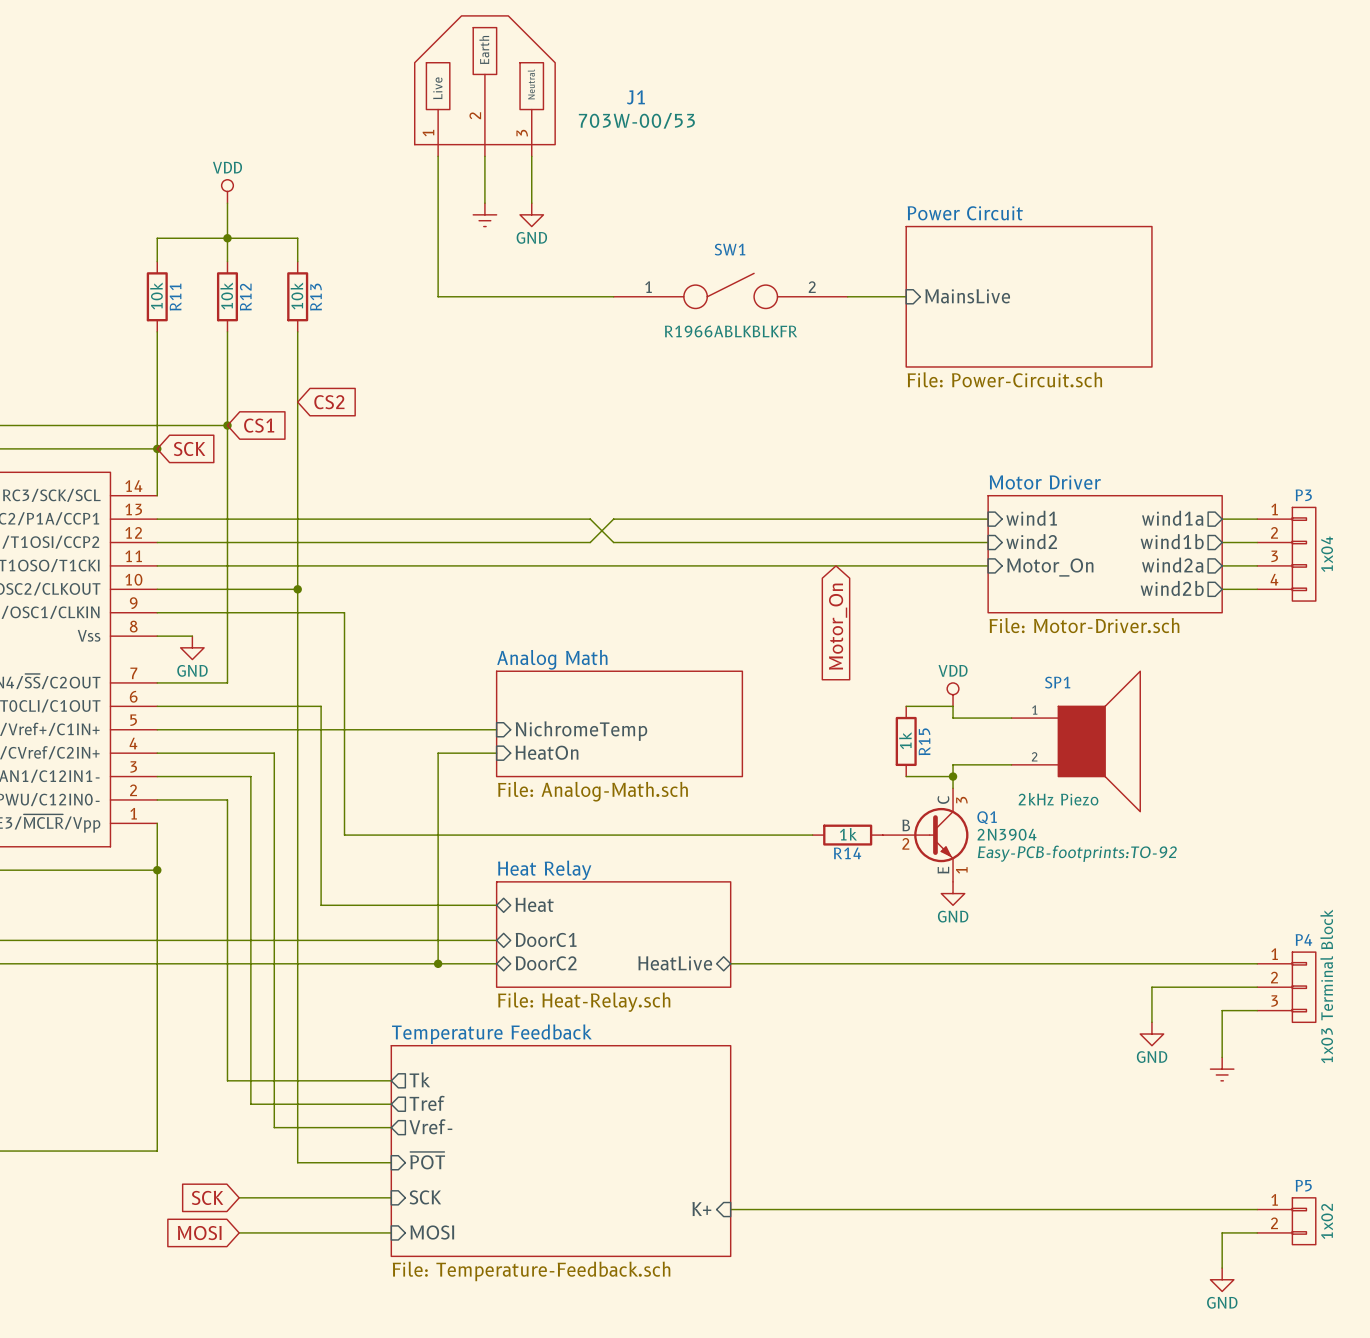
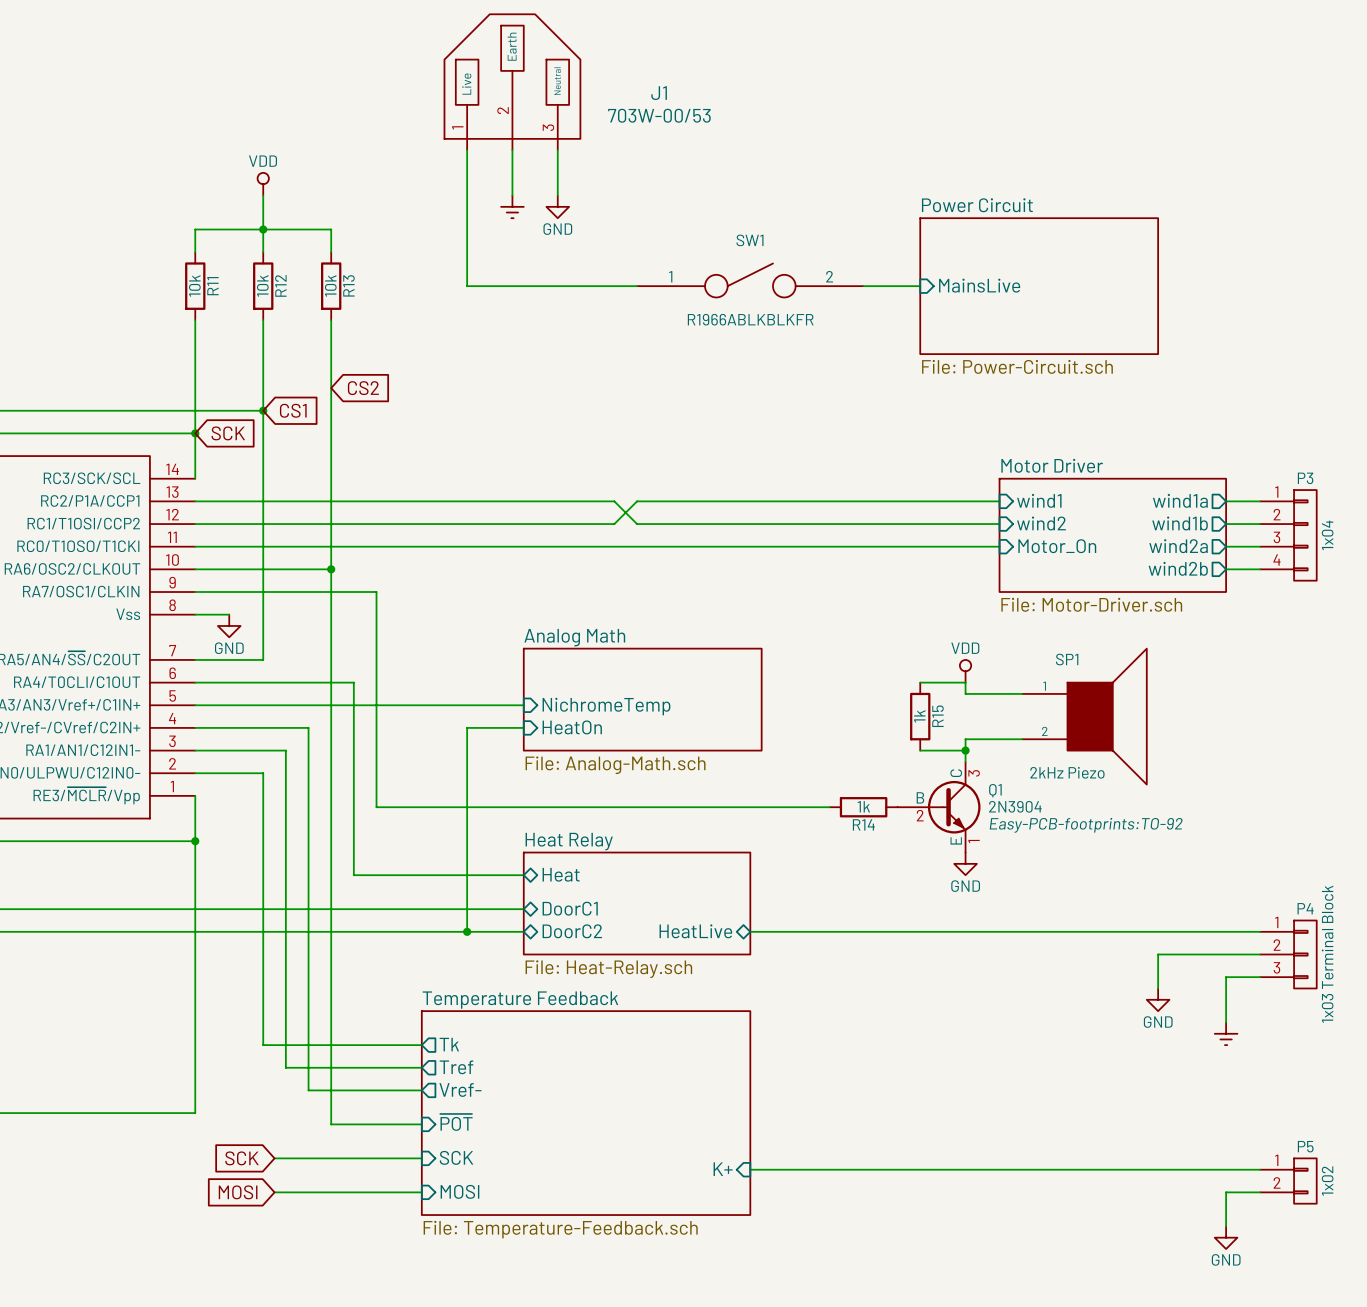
global label: Motor_On (838, 626) -> none

